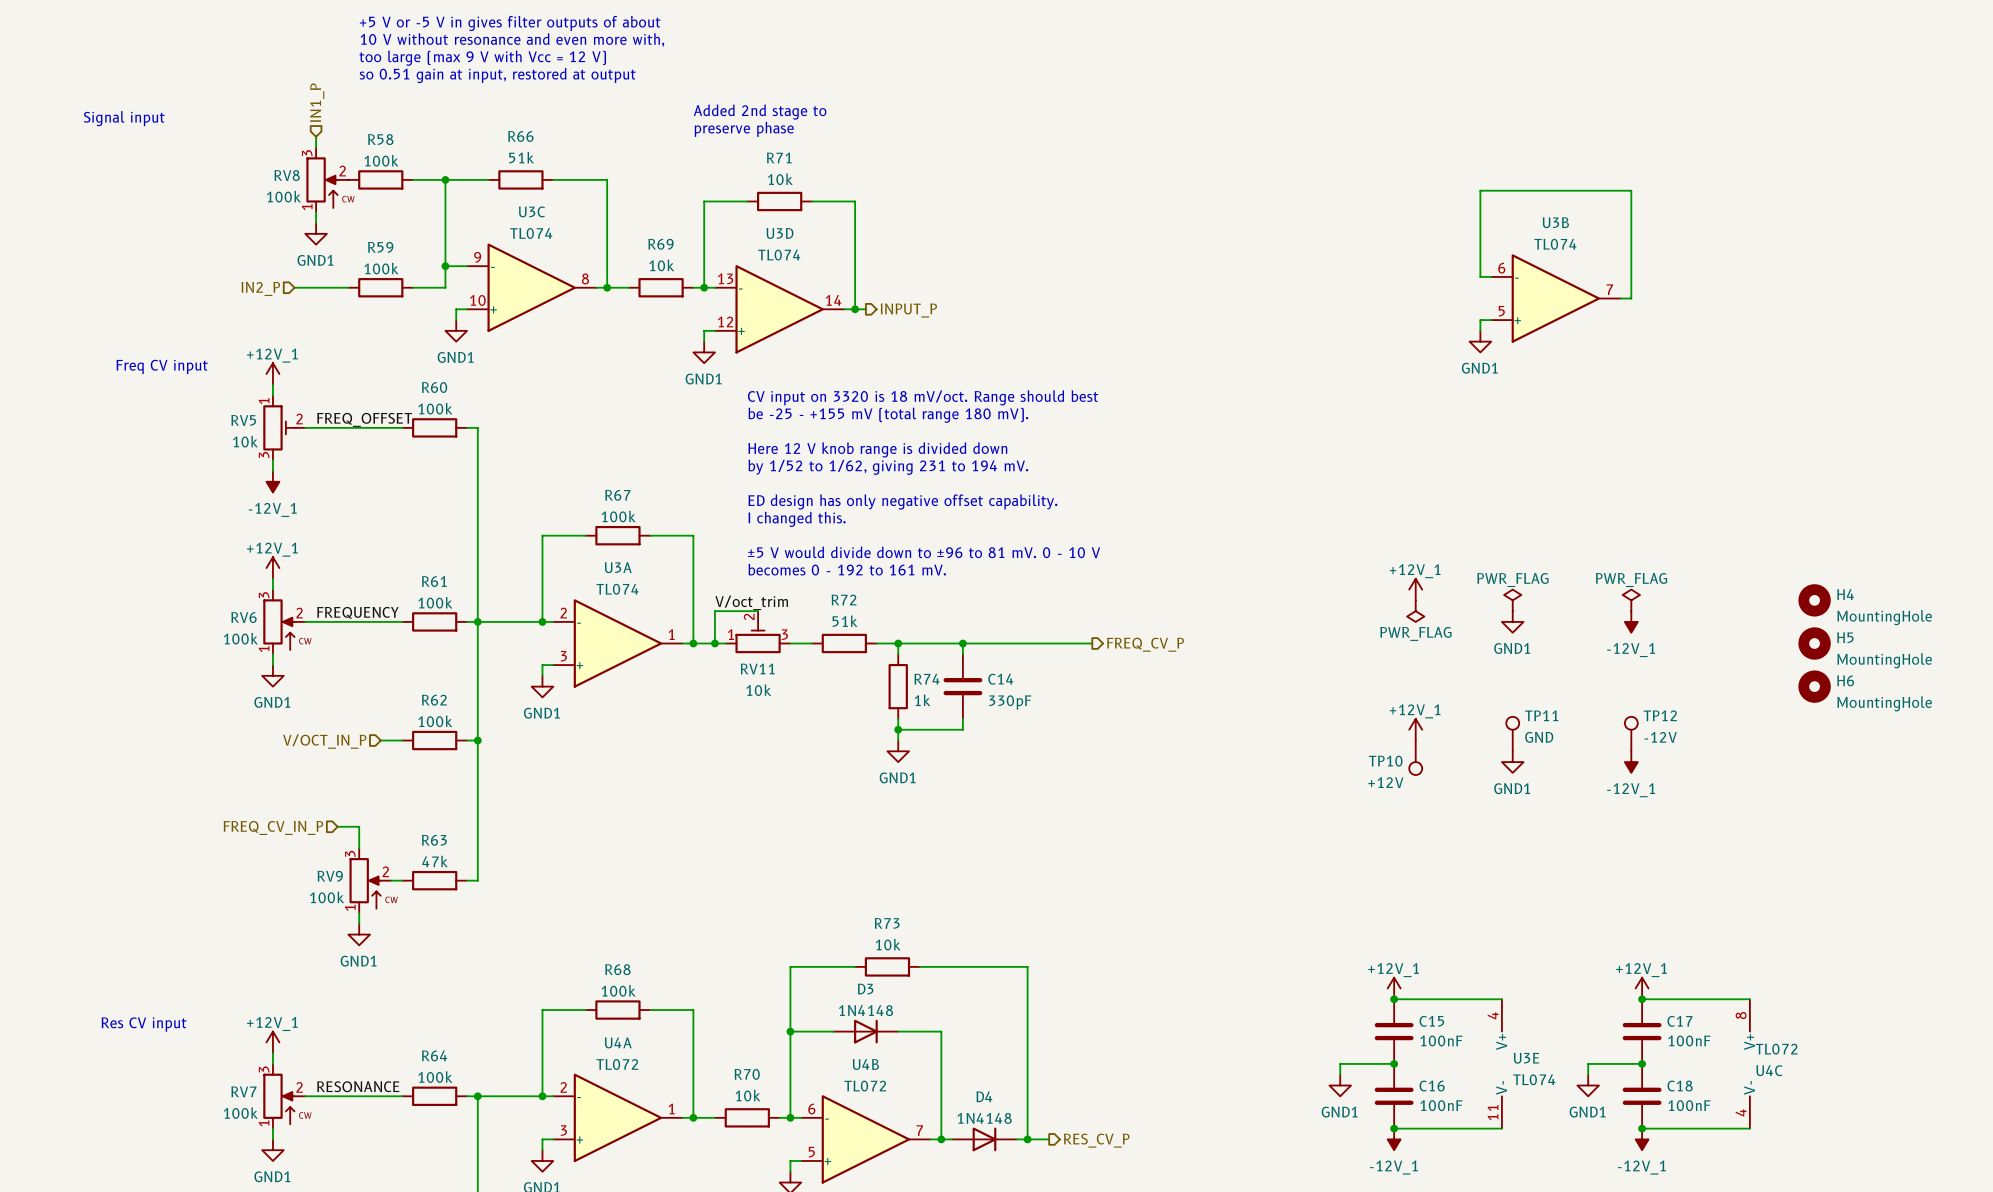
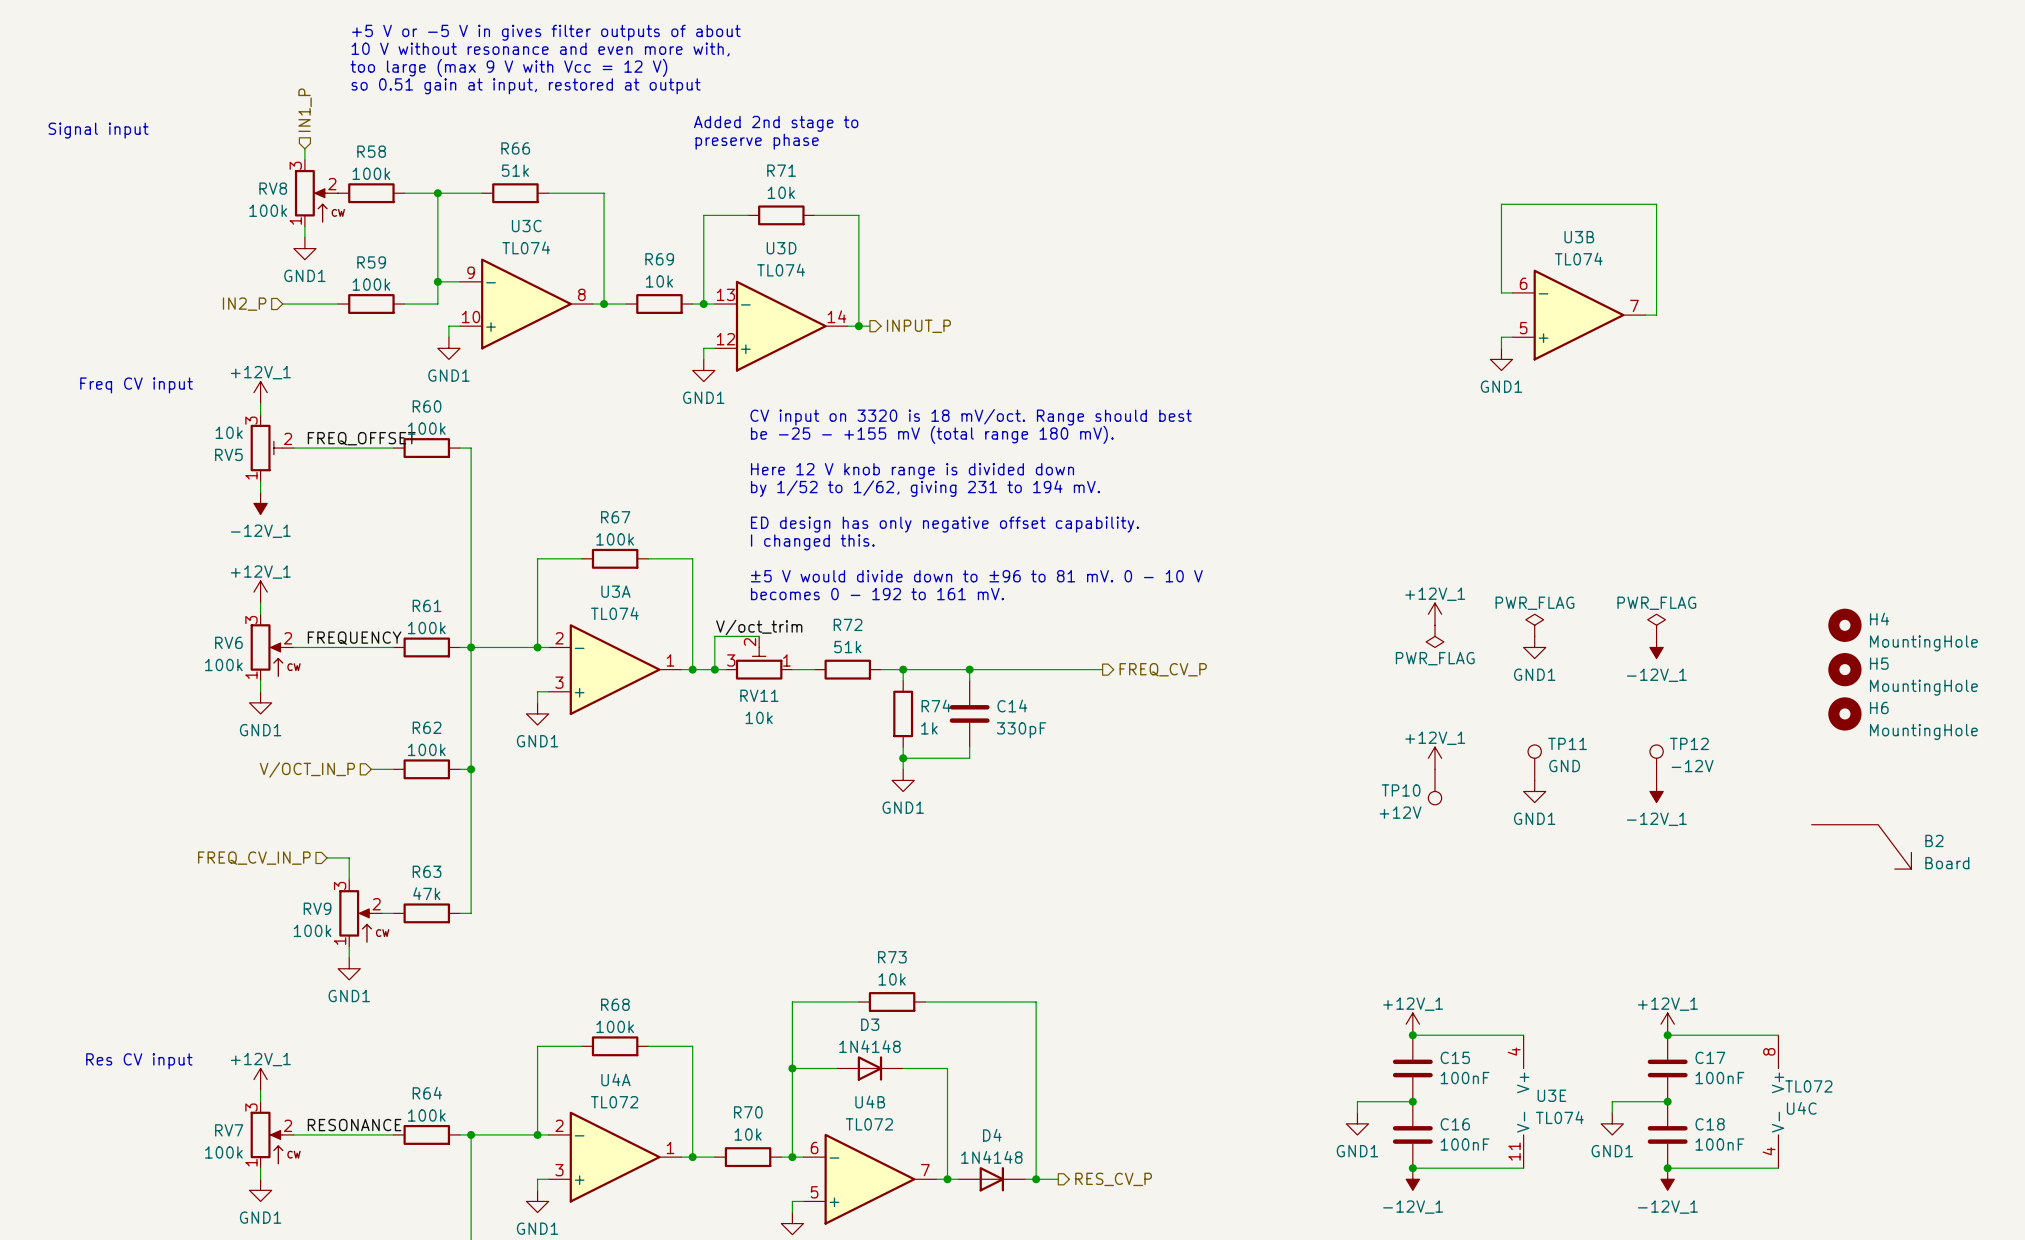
RV5 flip: as is (278, 427) -> up-down (266, 448)
RV11 flip: as is (758, 637) -> left-right (759, 663)
B2: none -> Board (1861, 846)

